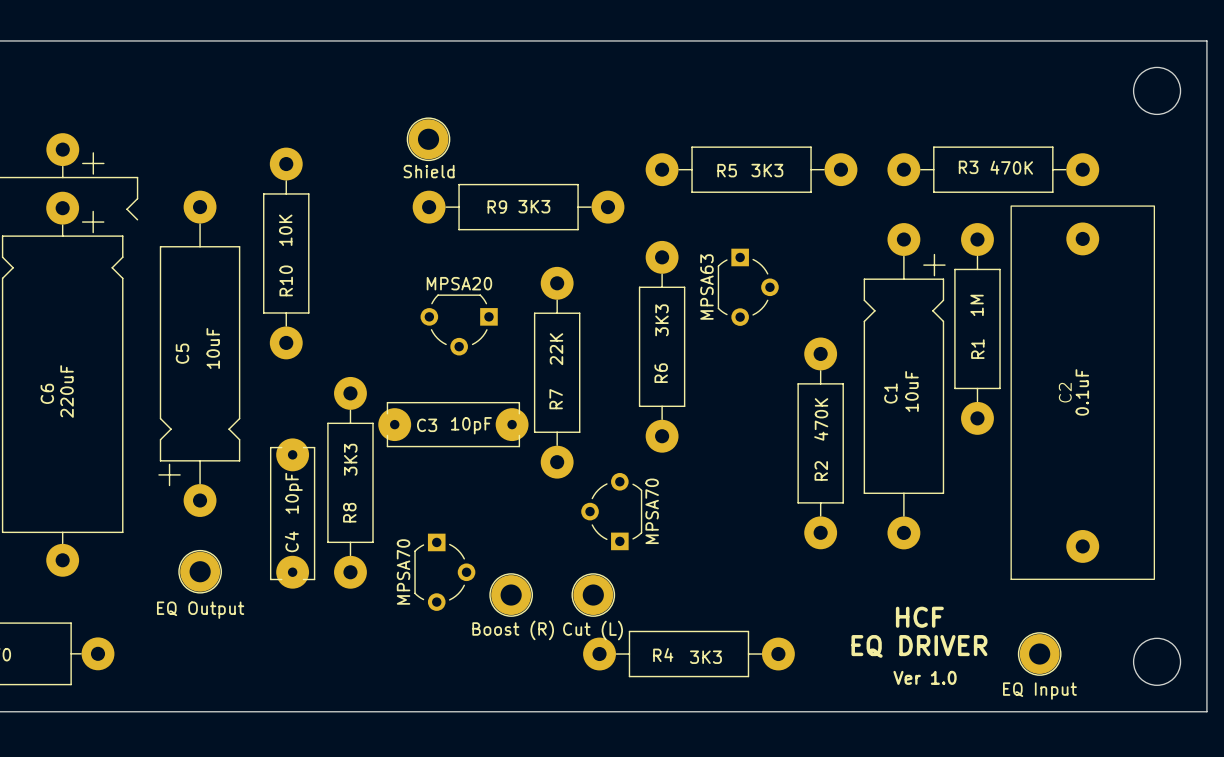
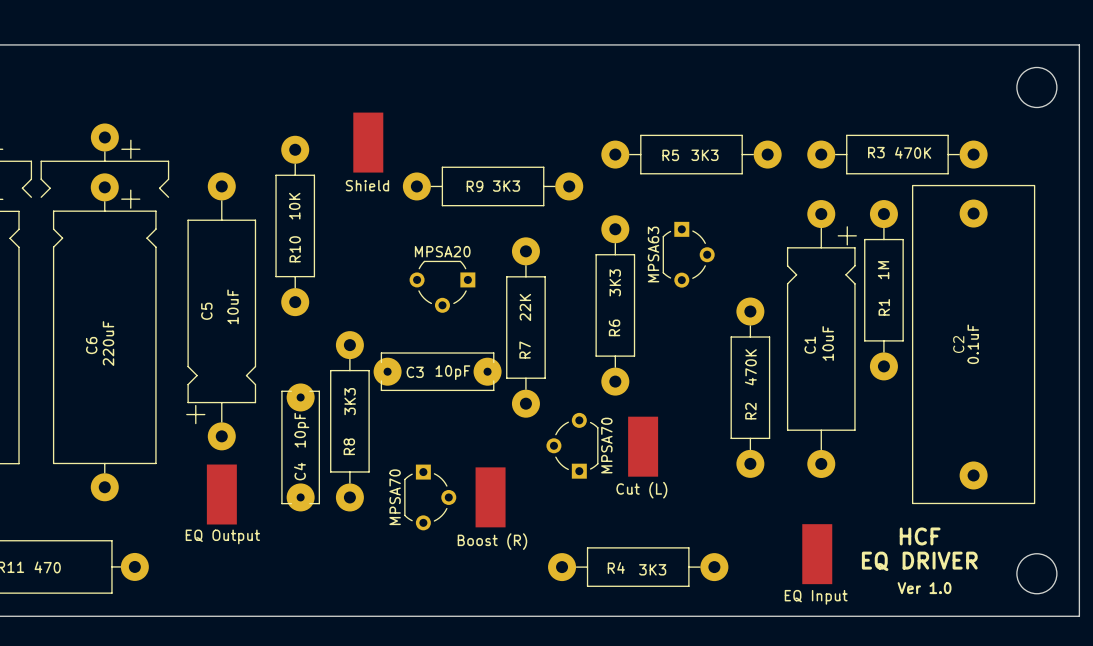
part: Shield (428, 139) -> none
part: none -> Shield (368, 142)
part: none -> Cut (L) (643, 446)
part footprint: [178, 549, 222, 594] -> [206, 464, 237, 525]
part: none -> Boost (R) (490, 497)
part: Boost (R) (511, 595) -> none
part: Cut (L) (593, 595) -> none
text position: HCF (919, 617) -> HCF (920, 536)
part: none -> EQ Input (817, 554)
text position: EQ DRIVER (919, 646) -> EQ DRIVER (919, 561)
part: EQ Input (1039, 654) -> none
text position: Ver 1.0 (925, 677) -> Ver 1.0 (924, 588)

